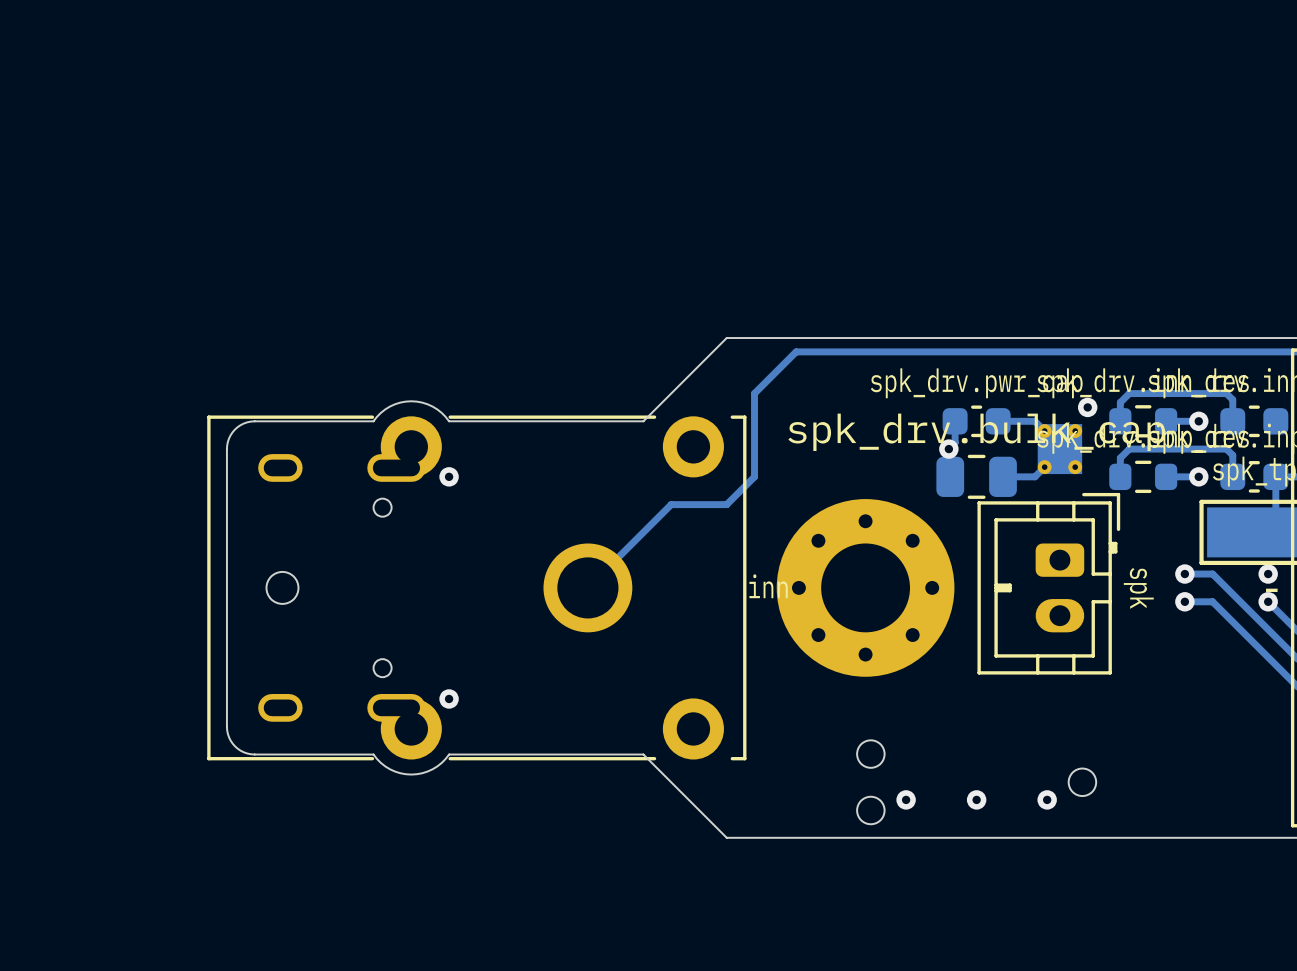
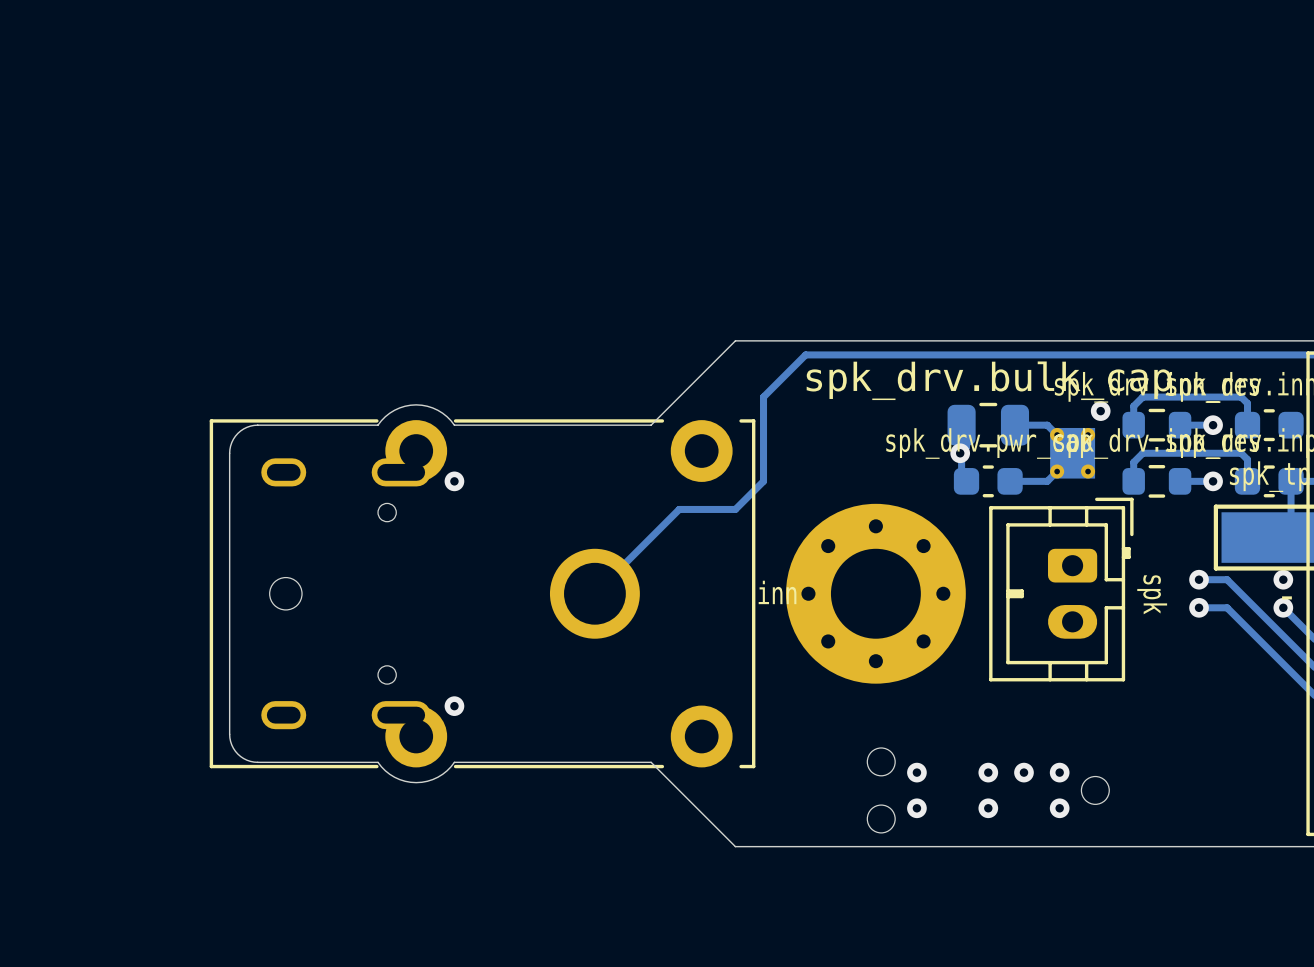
spk_drv.pwr_cap position: (976, 421) -> (988, 481)
spk_drv.bulk_cap position: (976, 476) -> (988, 425)
via: none -> (916, 772)
via: none -> (988, 772)
via: none -> (1023, 772)
via: none -> (1059, 772)

